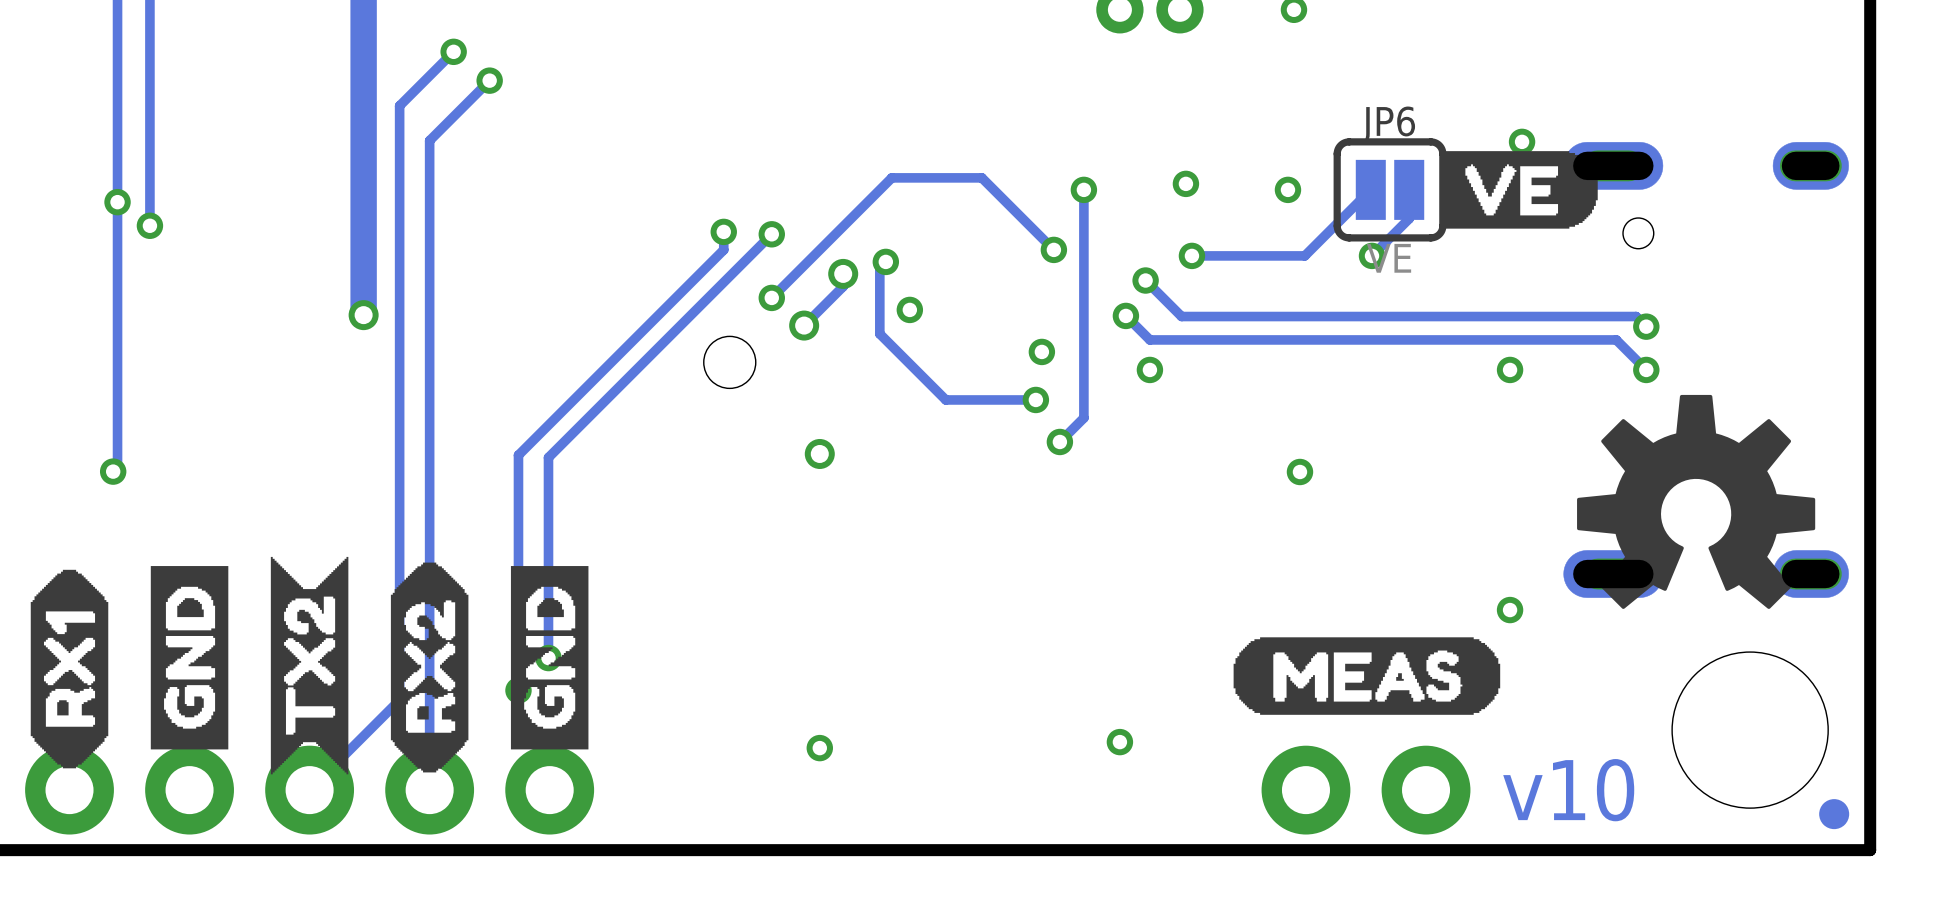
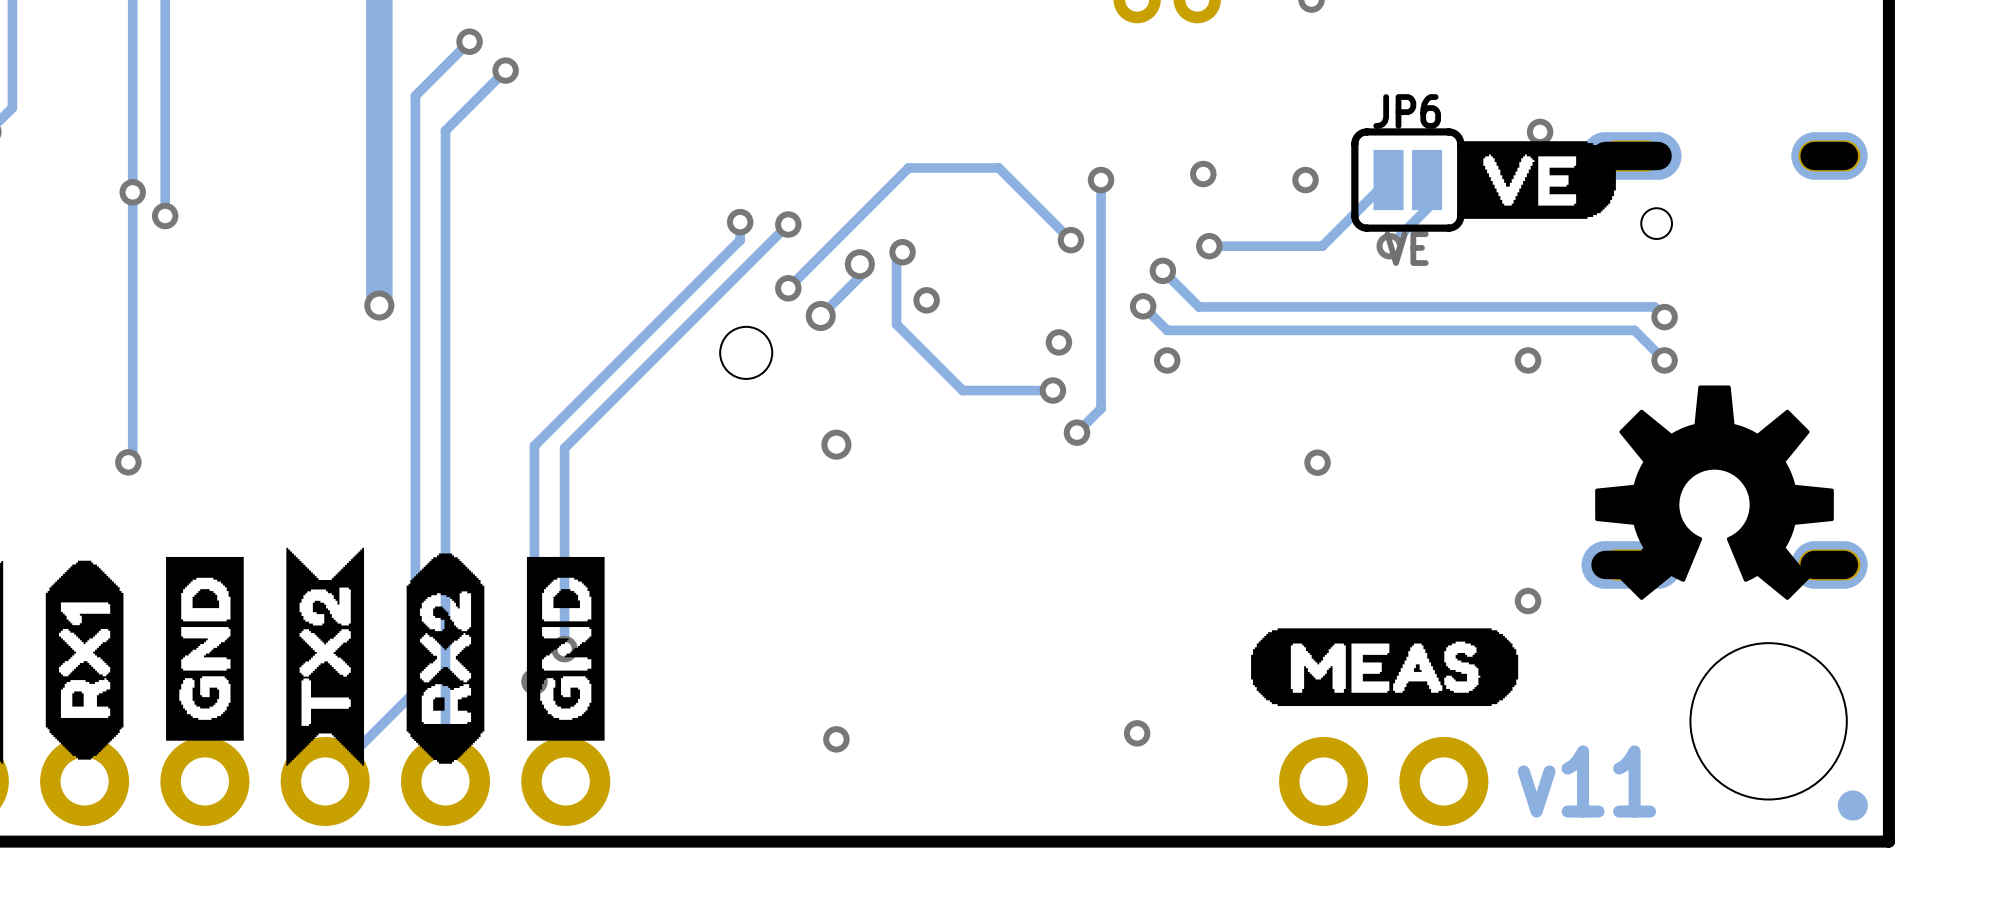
text: v10 (1568, 790) -> v11 (1586, 781)

